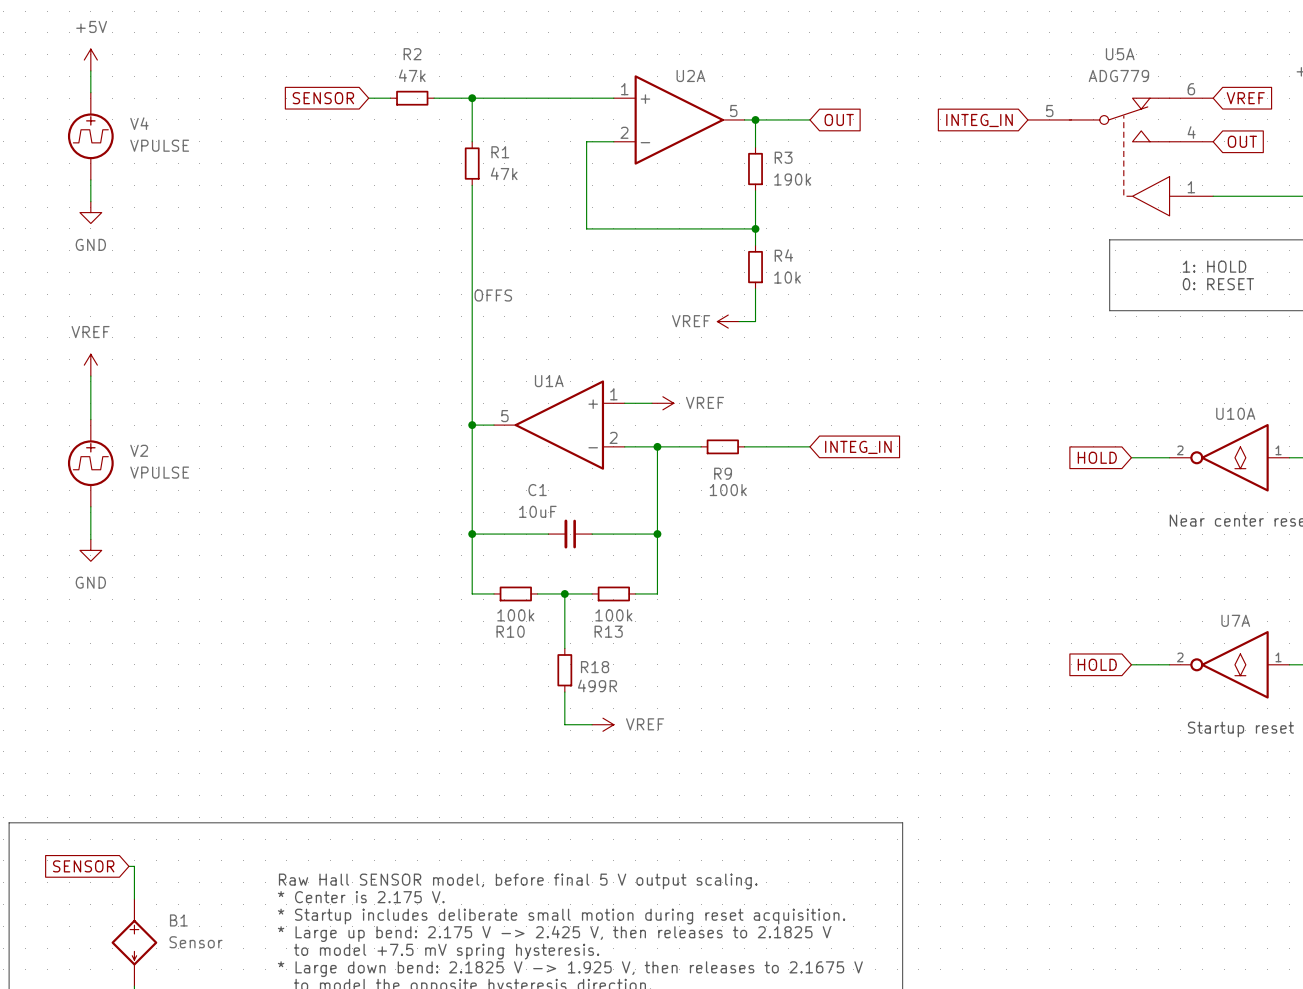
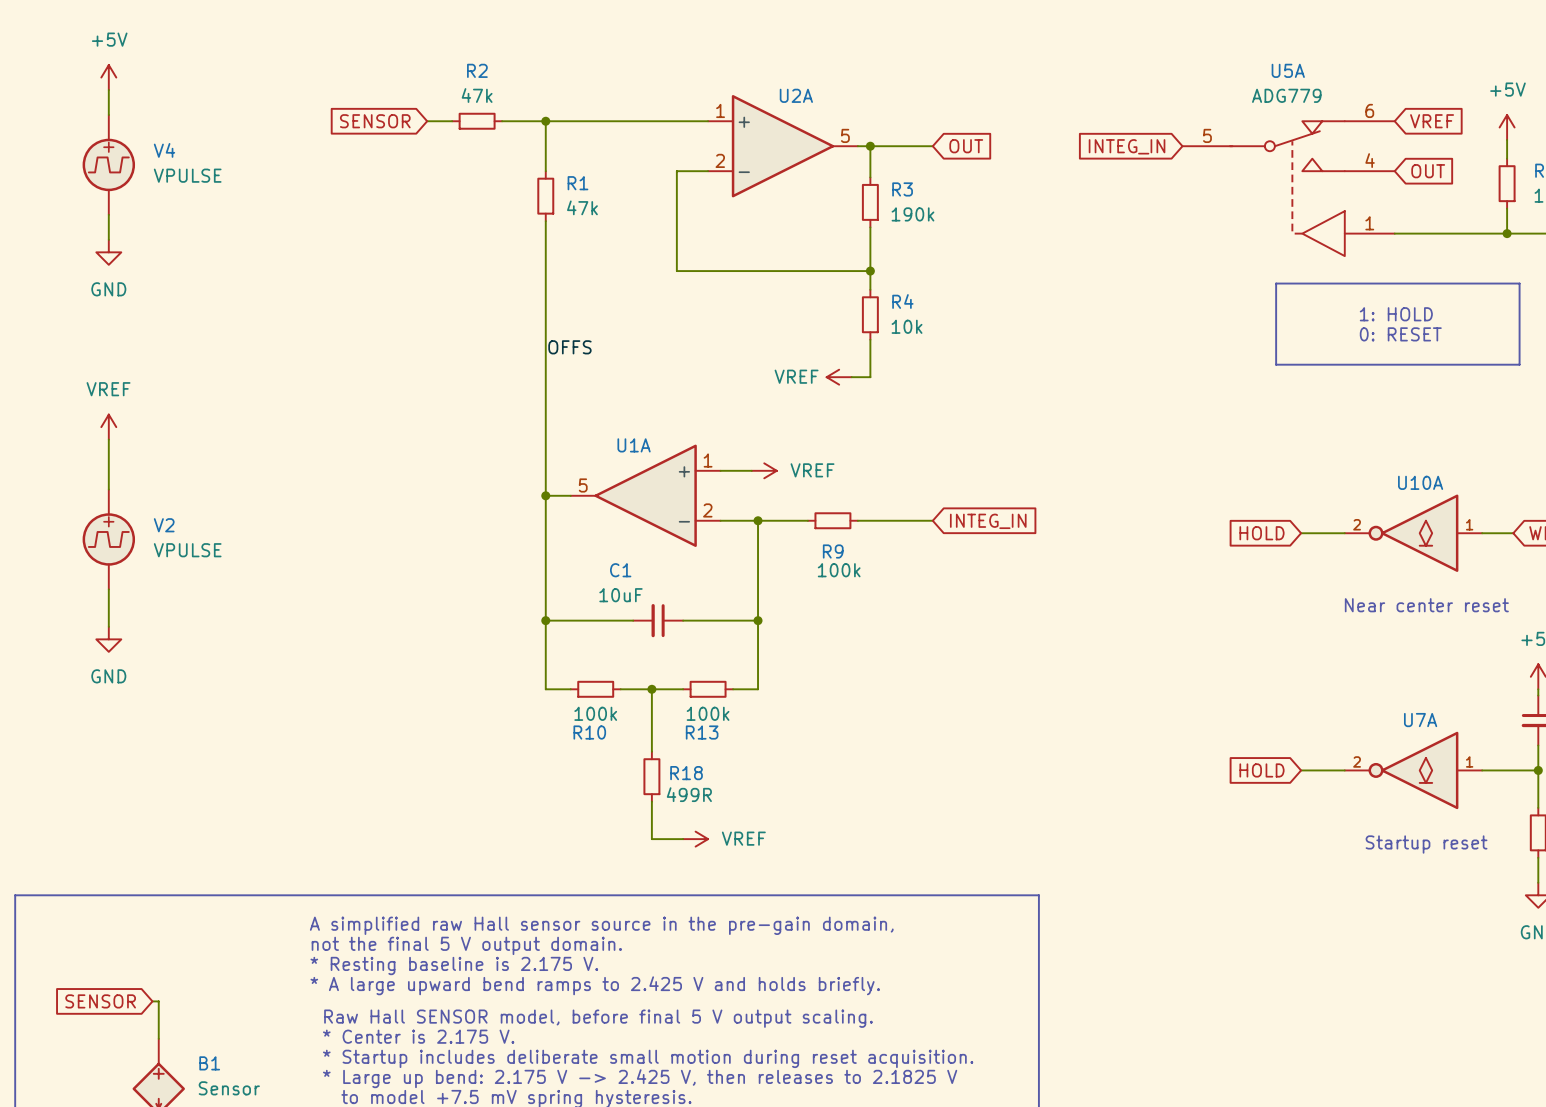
text: none -> A simplified raw Hall sensor source in the pre-gain domain, (601, 925)
text: none -> not the final 5 V output domain. (466, 945)
line: (9, 822) (902, 822) -> (15, 951) (15, 895) (1038, 895) (1038, 951)
text: none -> * Resting baseline is 2.175 V. (454, 965)
text: none -> * A large upward bend ramps to 2.425 V and holds briefly. (595, 985)

